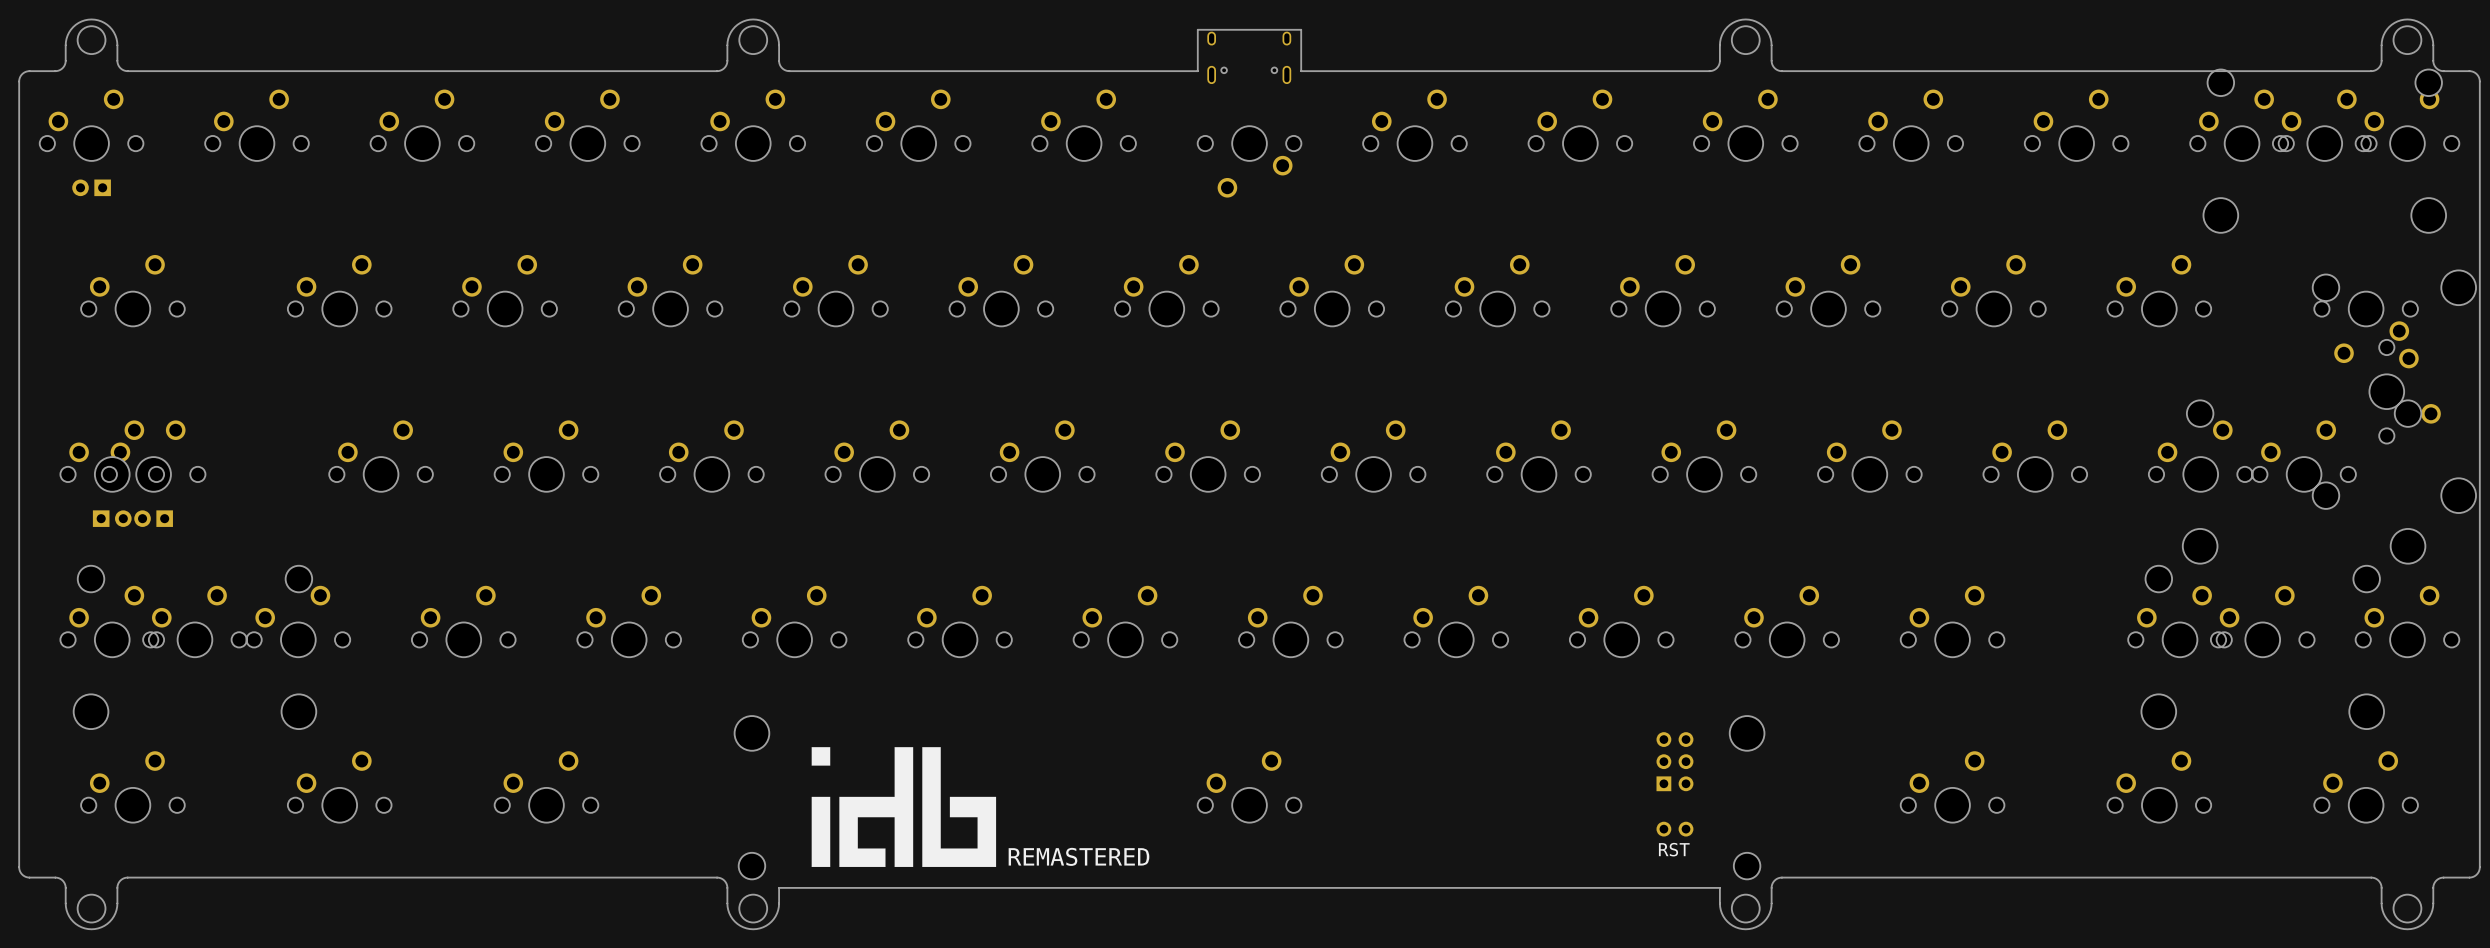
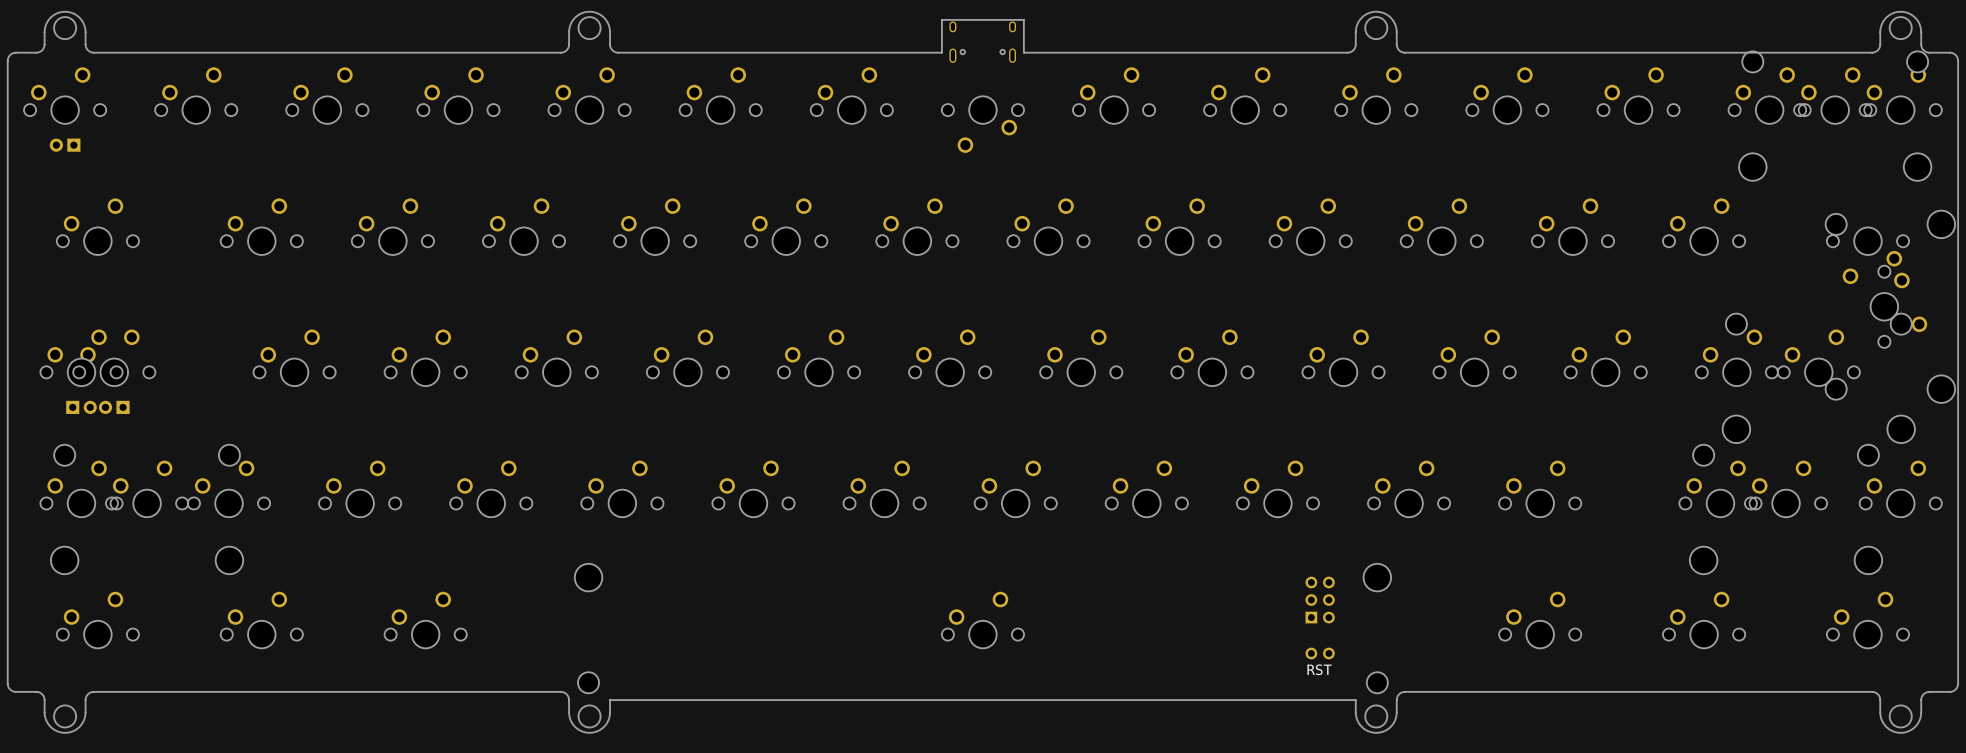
drawing: [811, 747, 997, 868] -> none
text: REMASTERED (1078, 856) -> none

